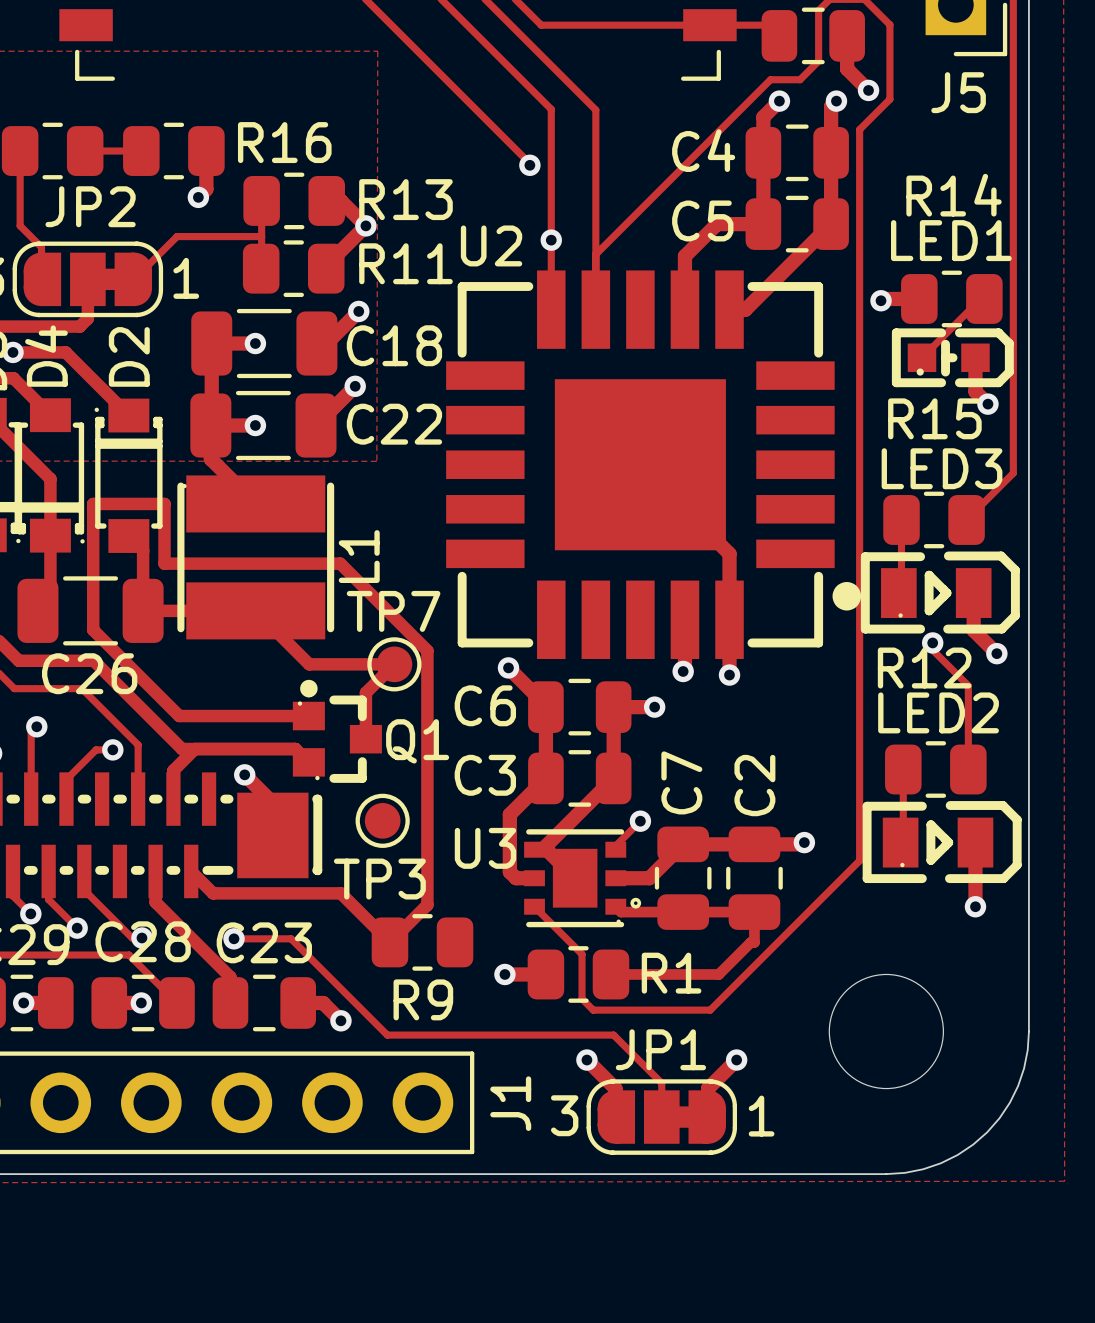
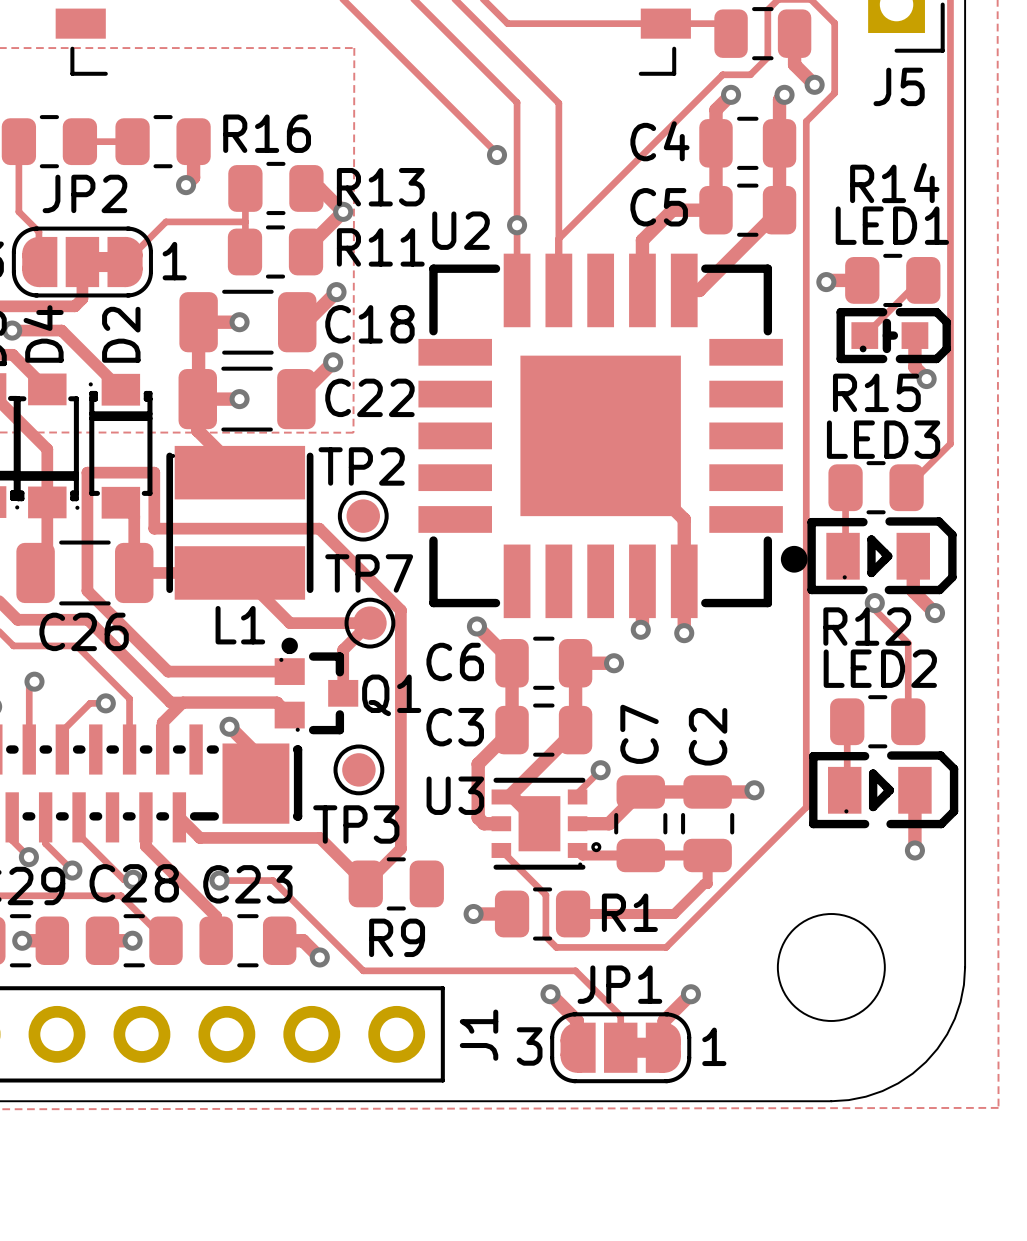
TP2: none -> (363, 516)
L1 name rotation: 0° (359, 556) -> 90° clockwise (240, 625)
L1 name position: L1 (359, 556) -> L1 (240, 625)

